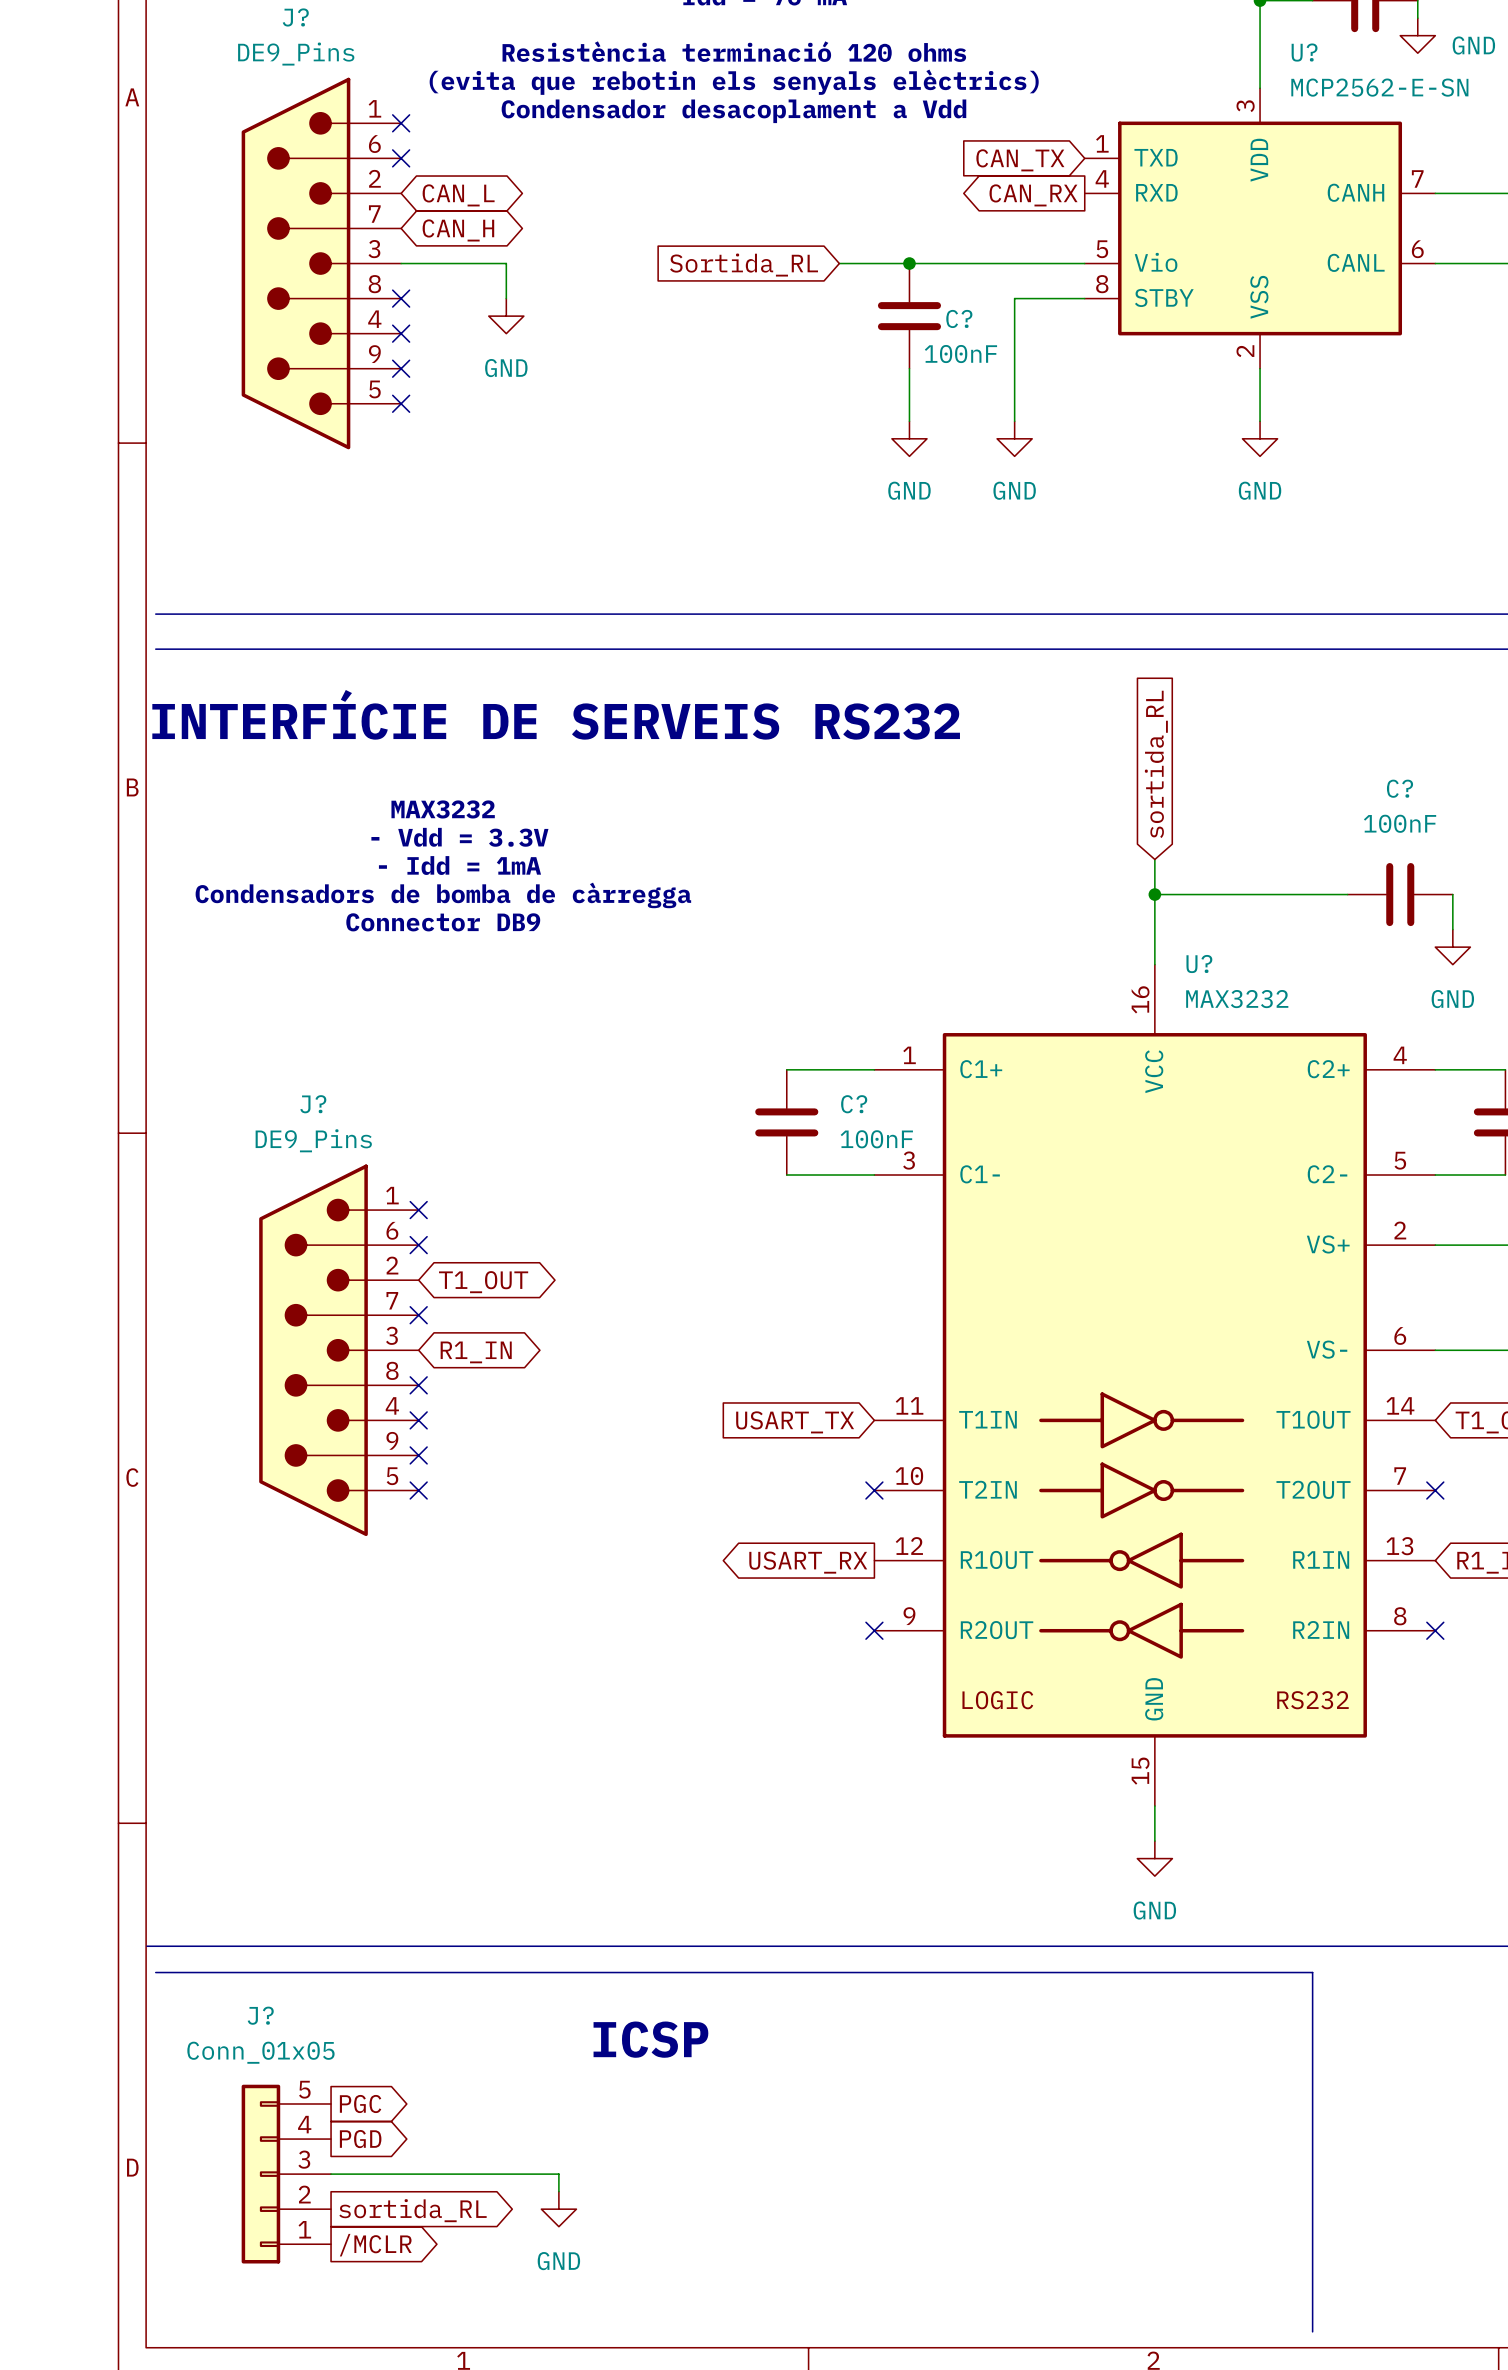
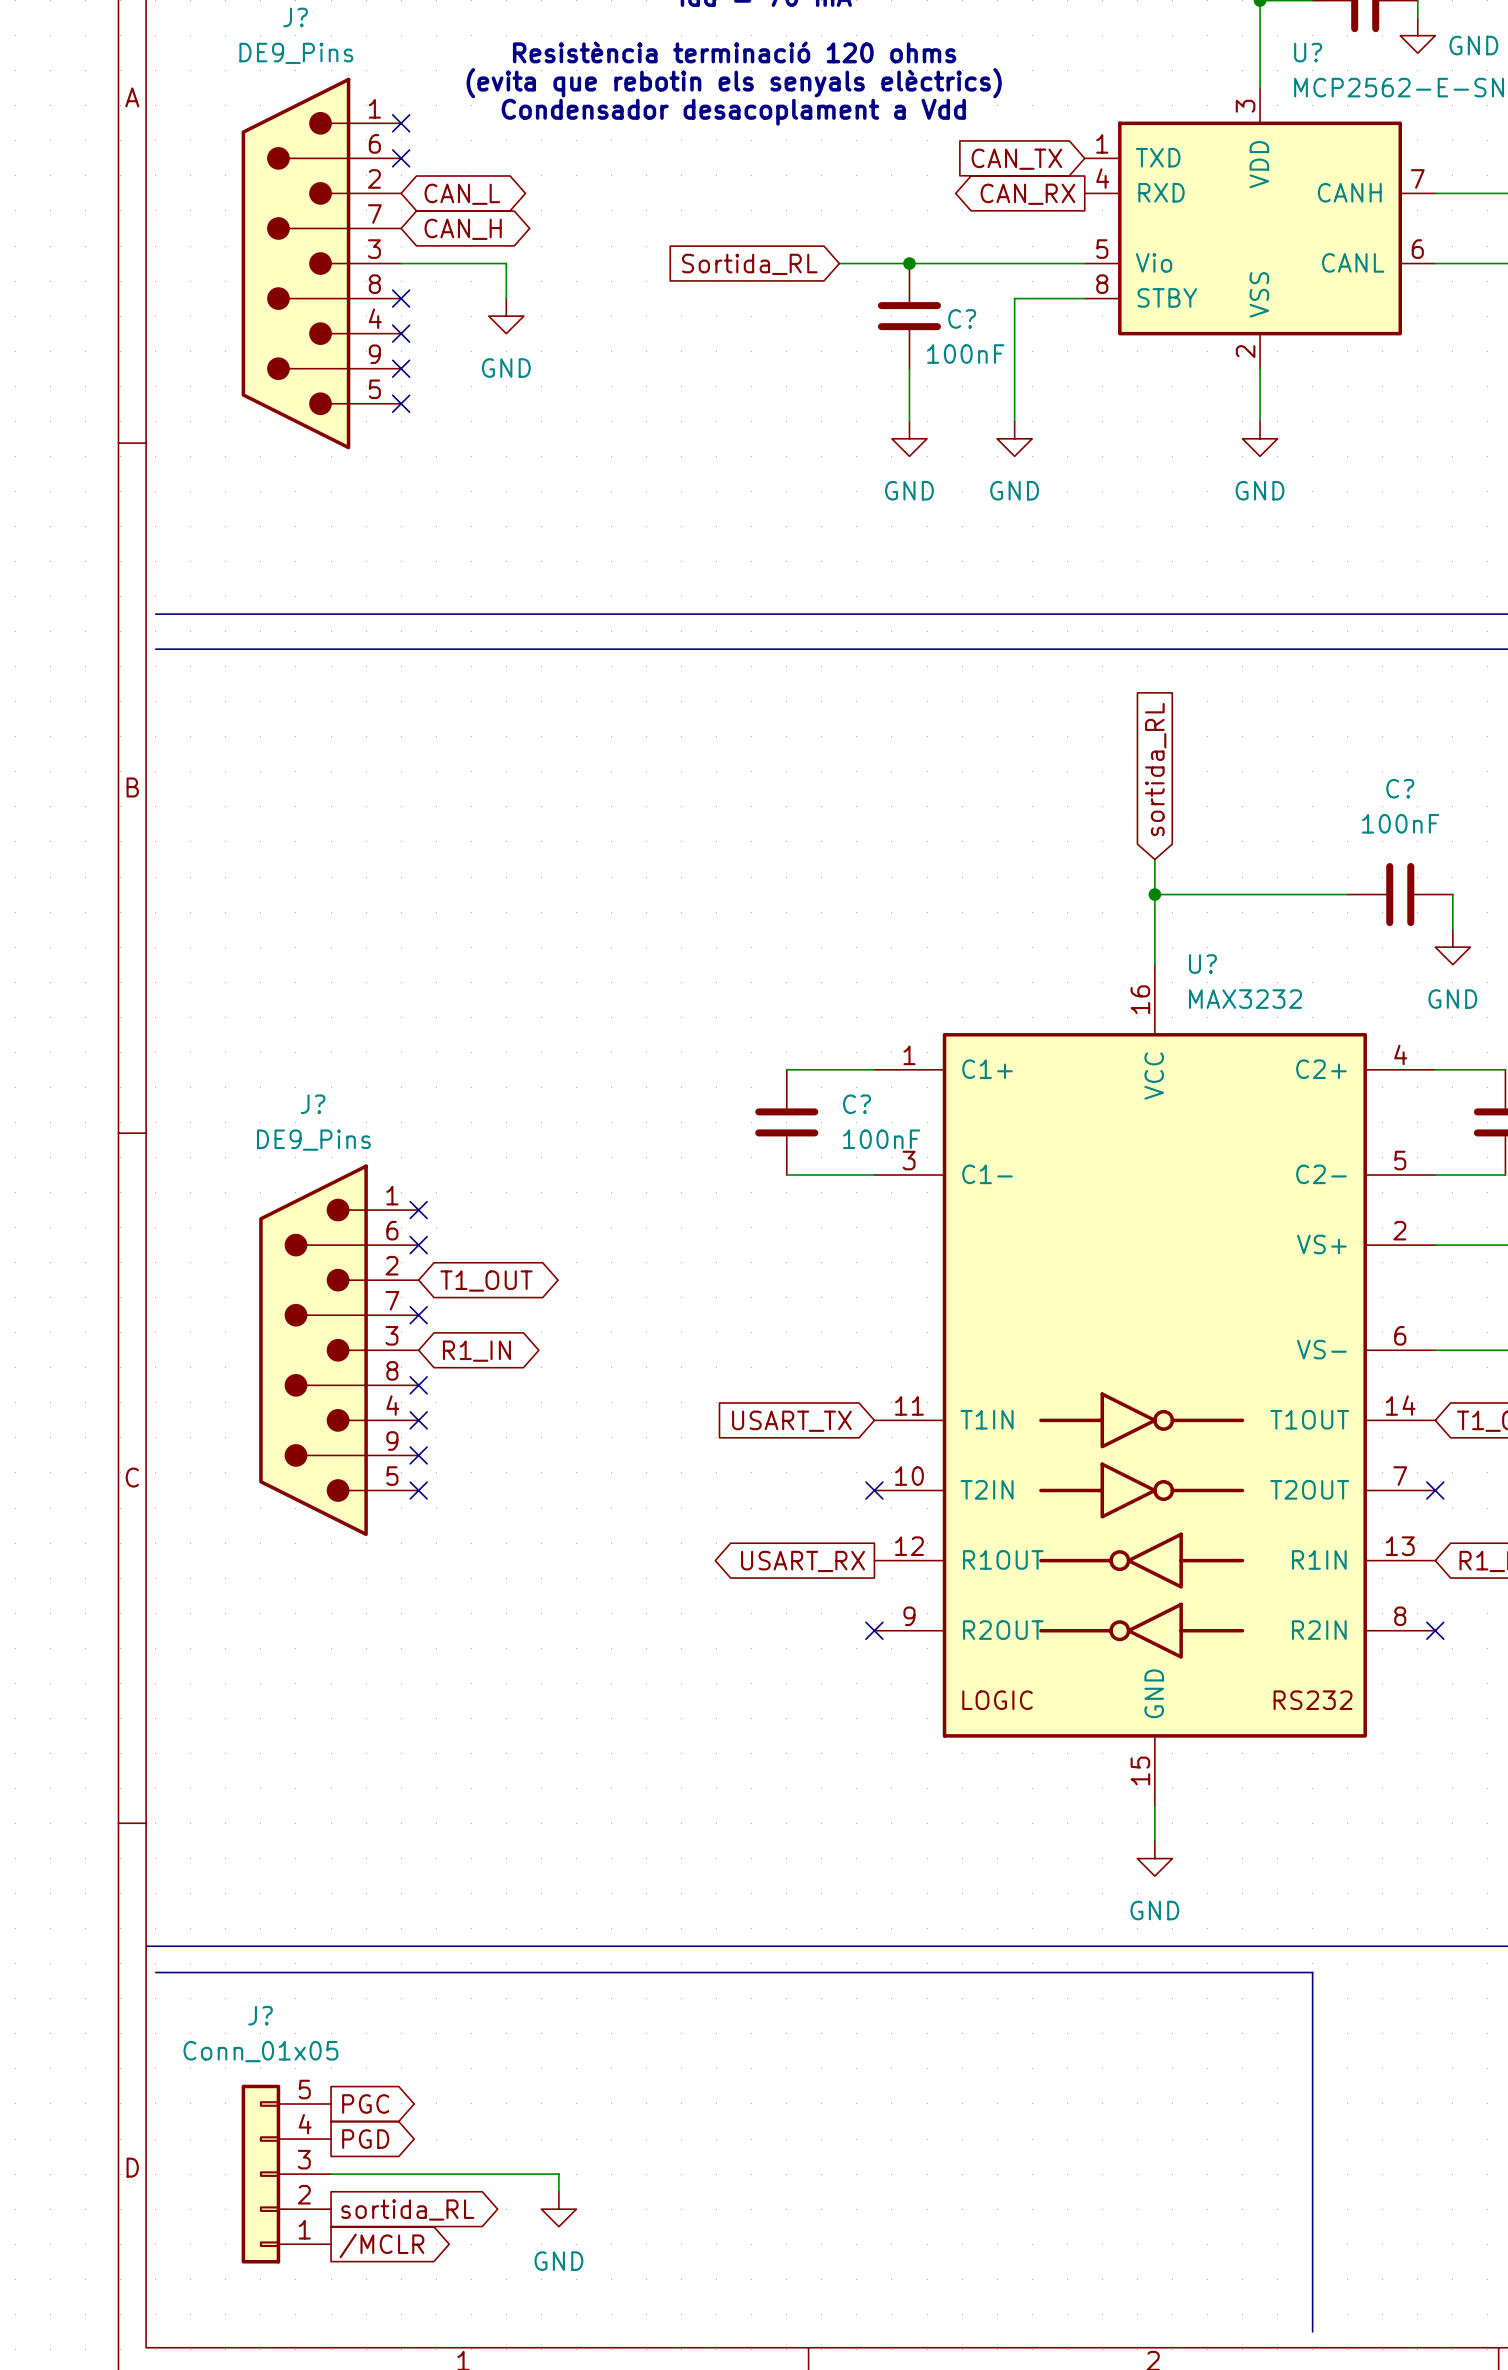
text: INTERFÍCIE DE SERVEIS RS232 (556, 714) -> none
text: MAX3232 (443, 809) -> none
text: - Vdd = 3.3V (459, 837) -> none
text: - Idd = 1mA (459, 865) -> none
text: Condensadors de bomba de càrregga (443, 895) -> none
text: Connector DB9 (443, 922) -> none
text: ICSP (650, 2039) -> none

